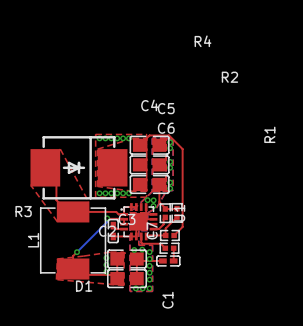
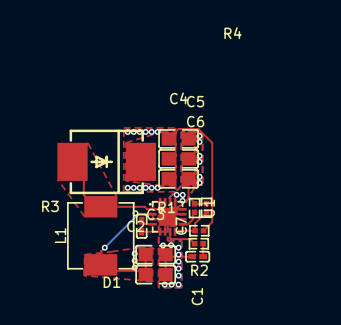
R2 name position: R2 (229, 77) -> R2 (199, 270)
R1 name rotation: 0° (269, 134) -> 90° clockwise (166, 207)
R1 name position: R1 (269, 134) -> R1 (166, 207)

